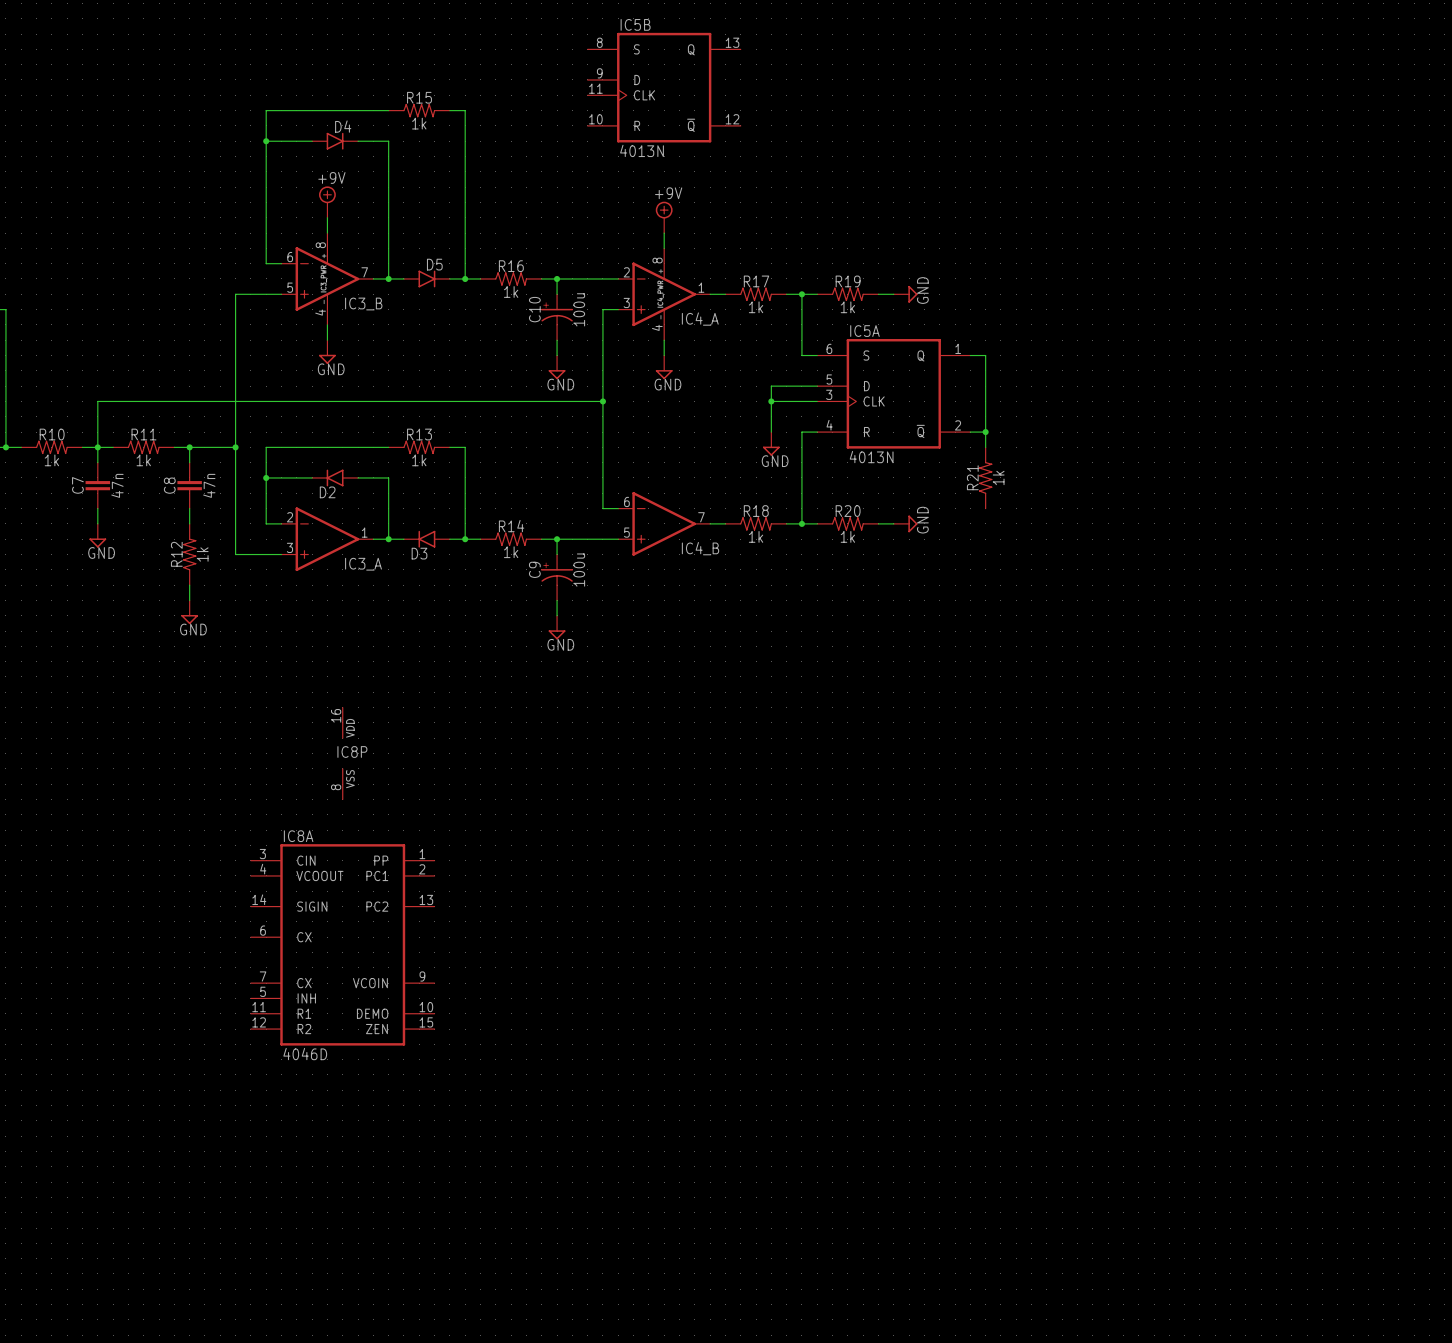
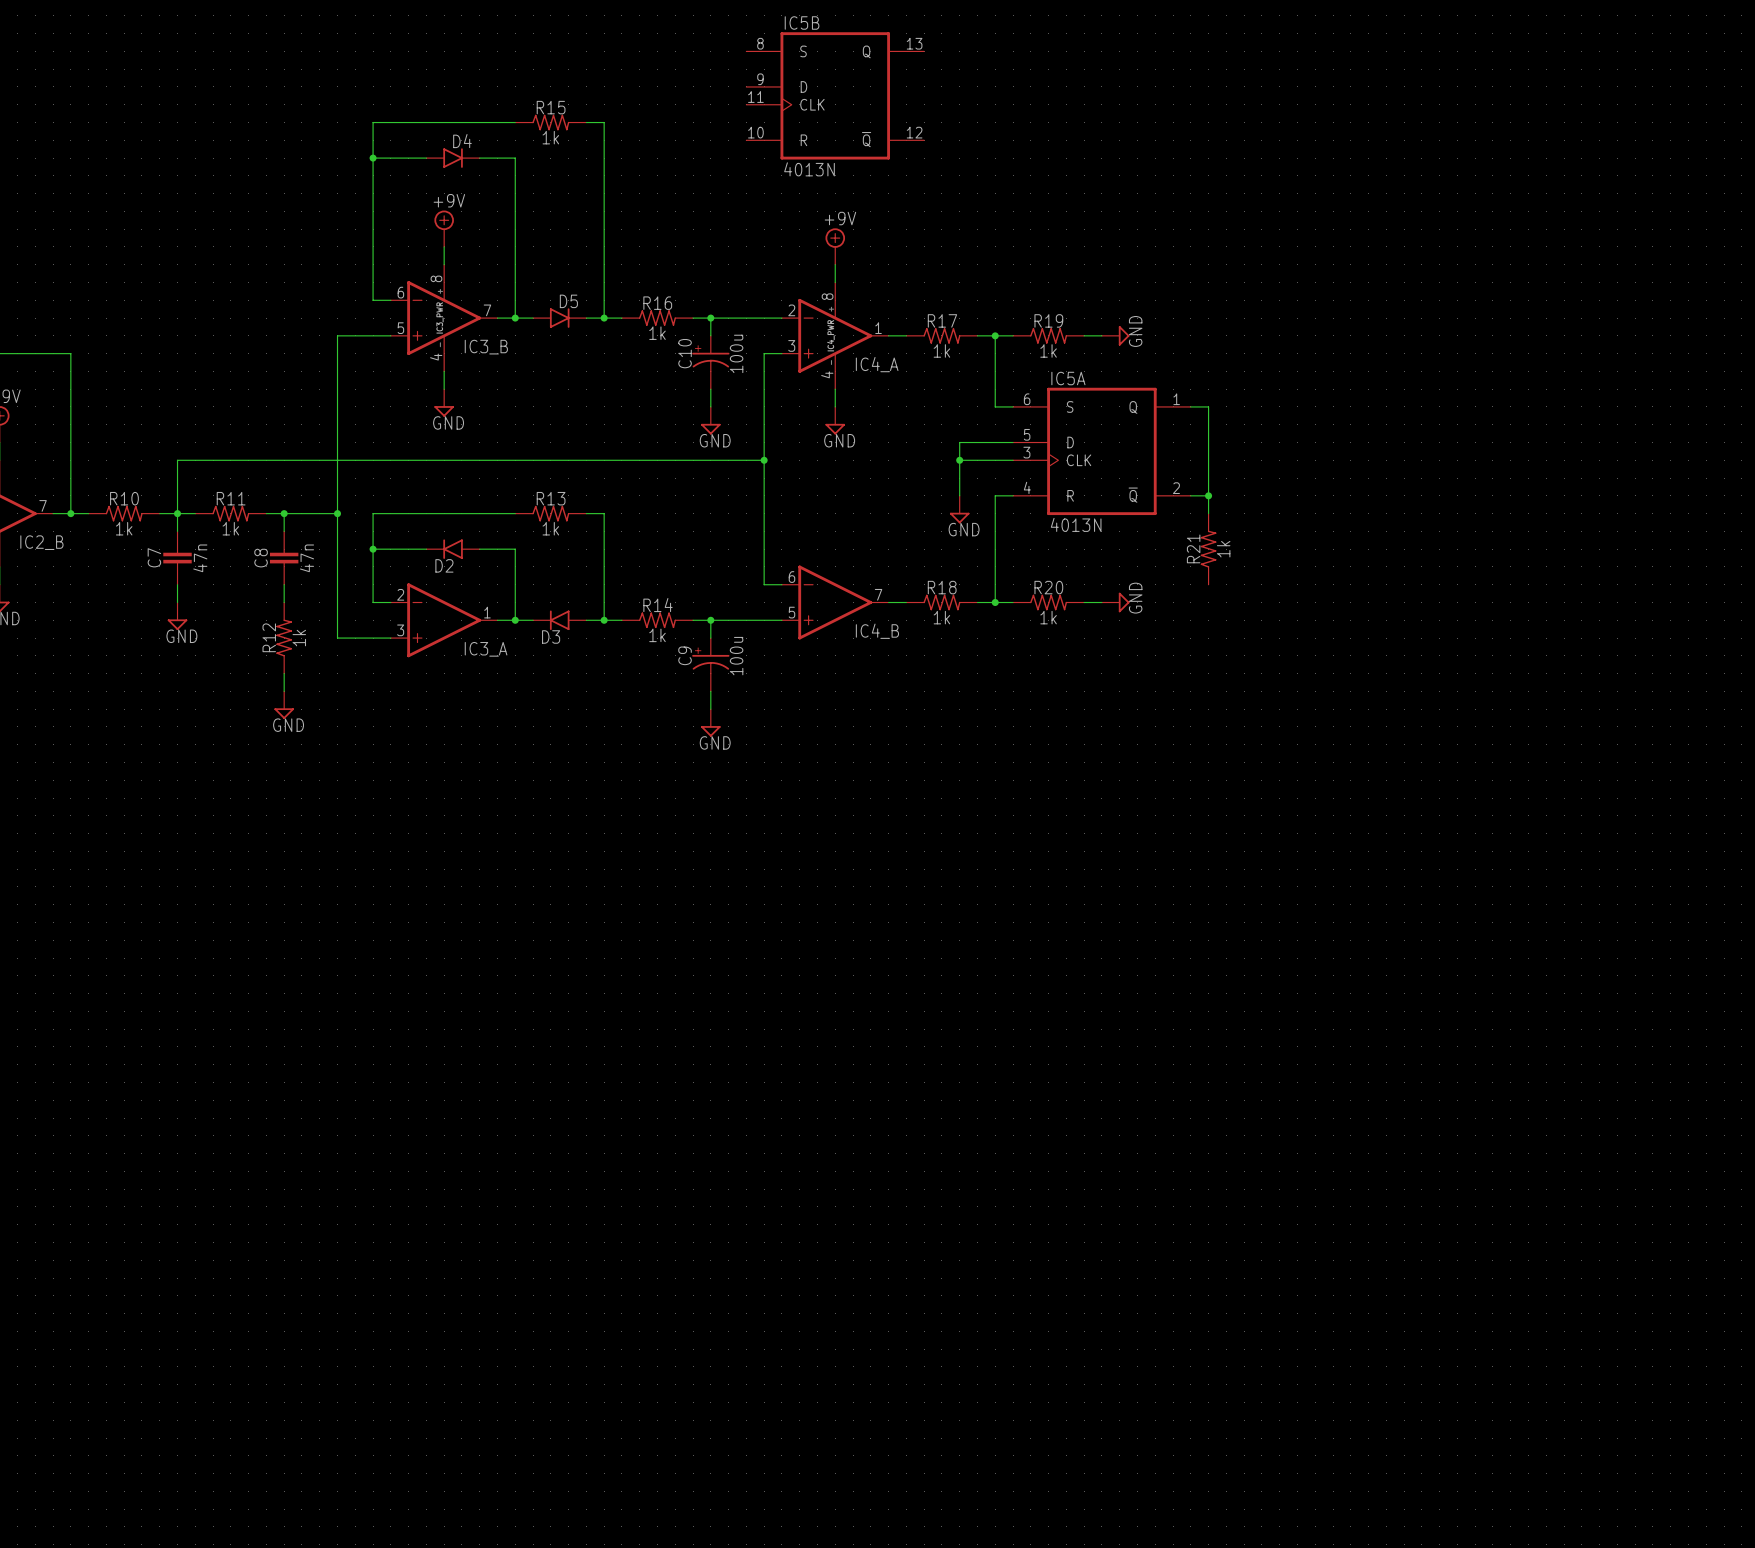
IC8P: (342, 753) -> none
IC8A: 4046D (342, 944) -> none

